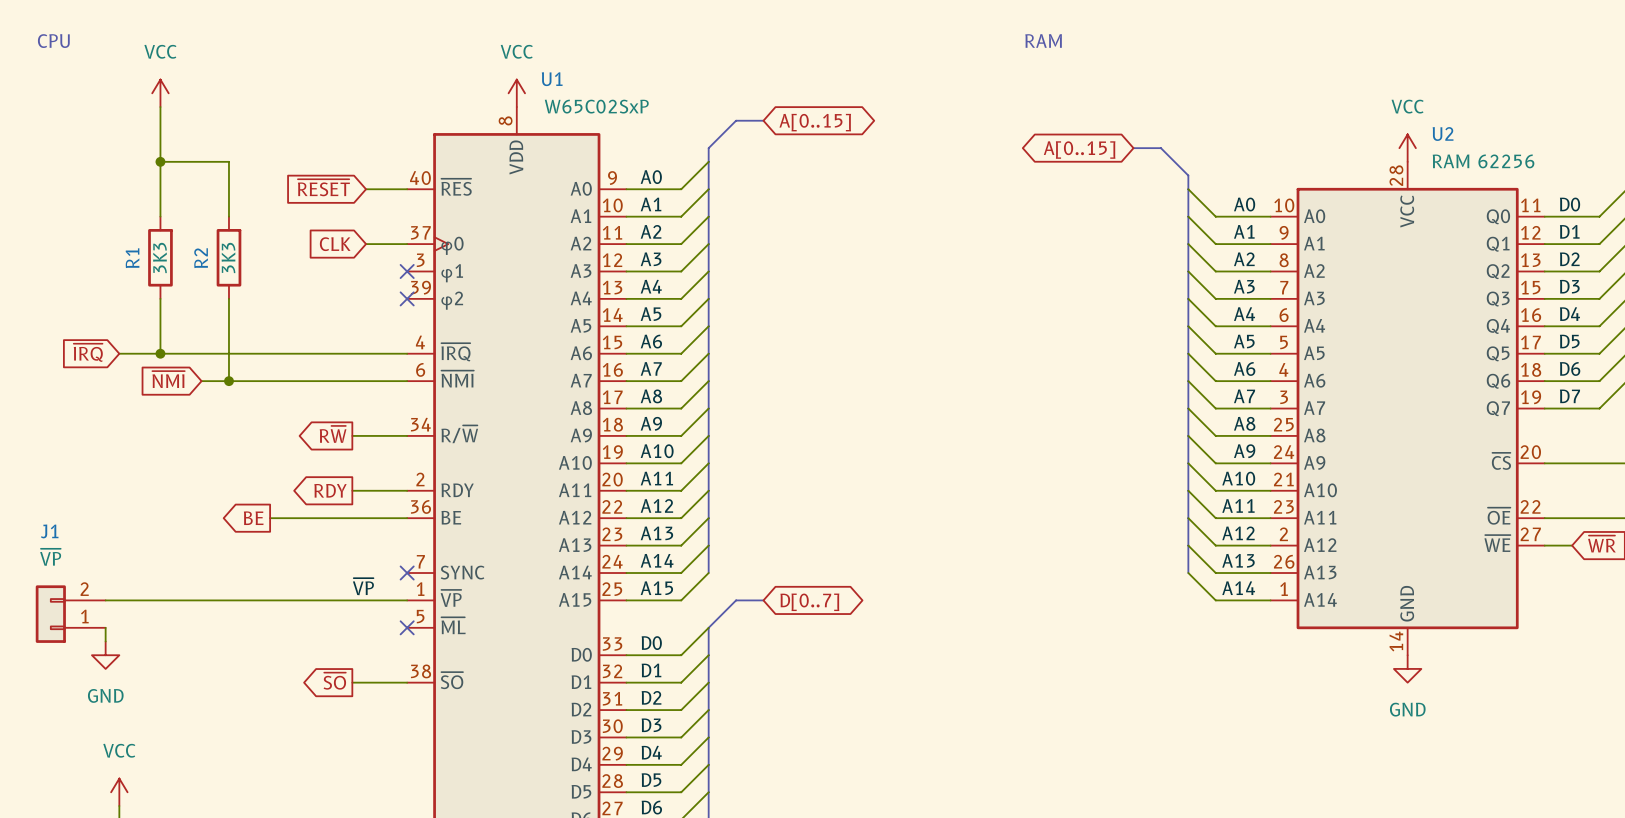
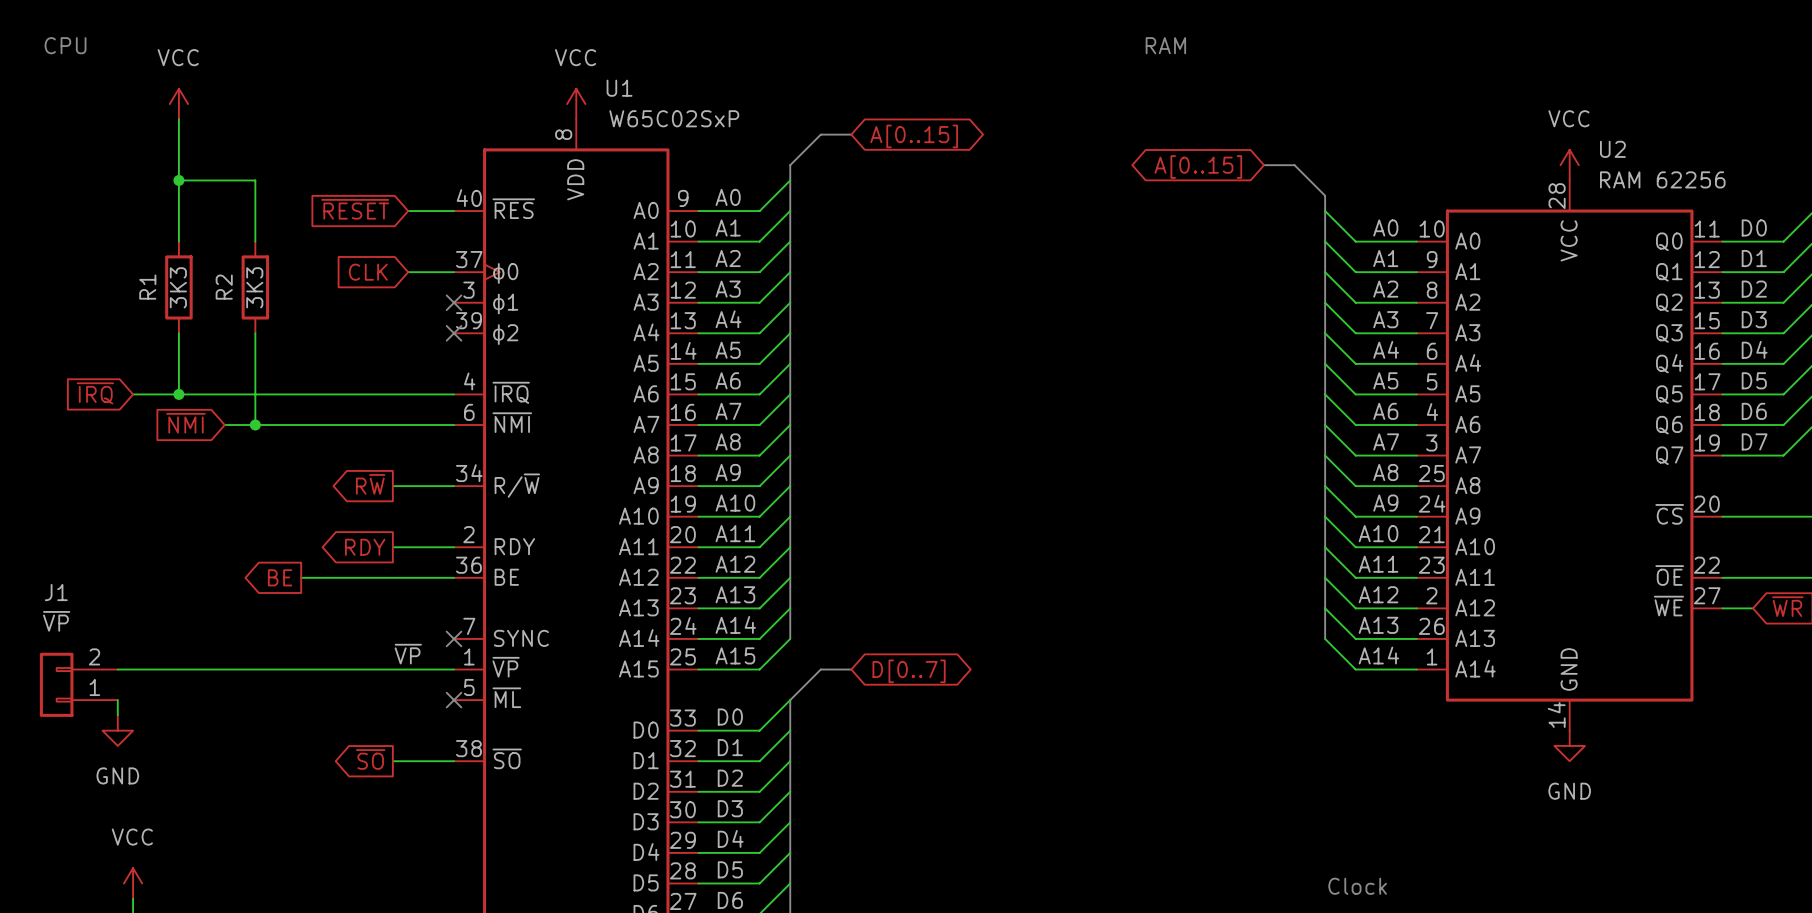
text: none -> Clock (1357, 886)

